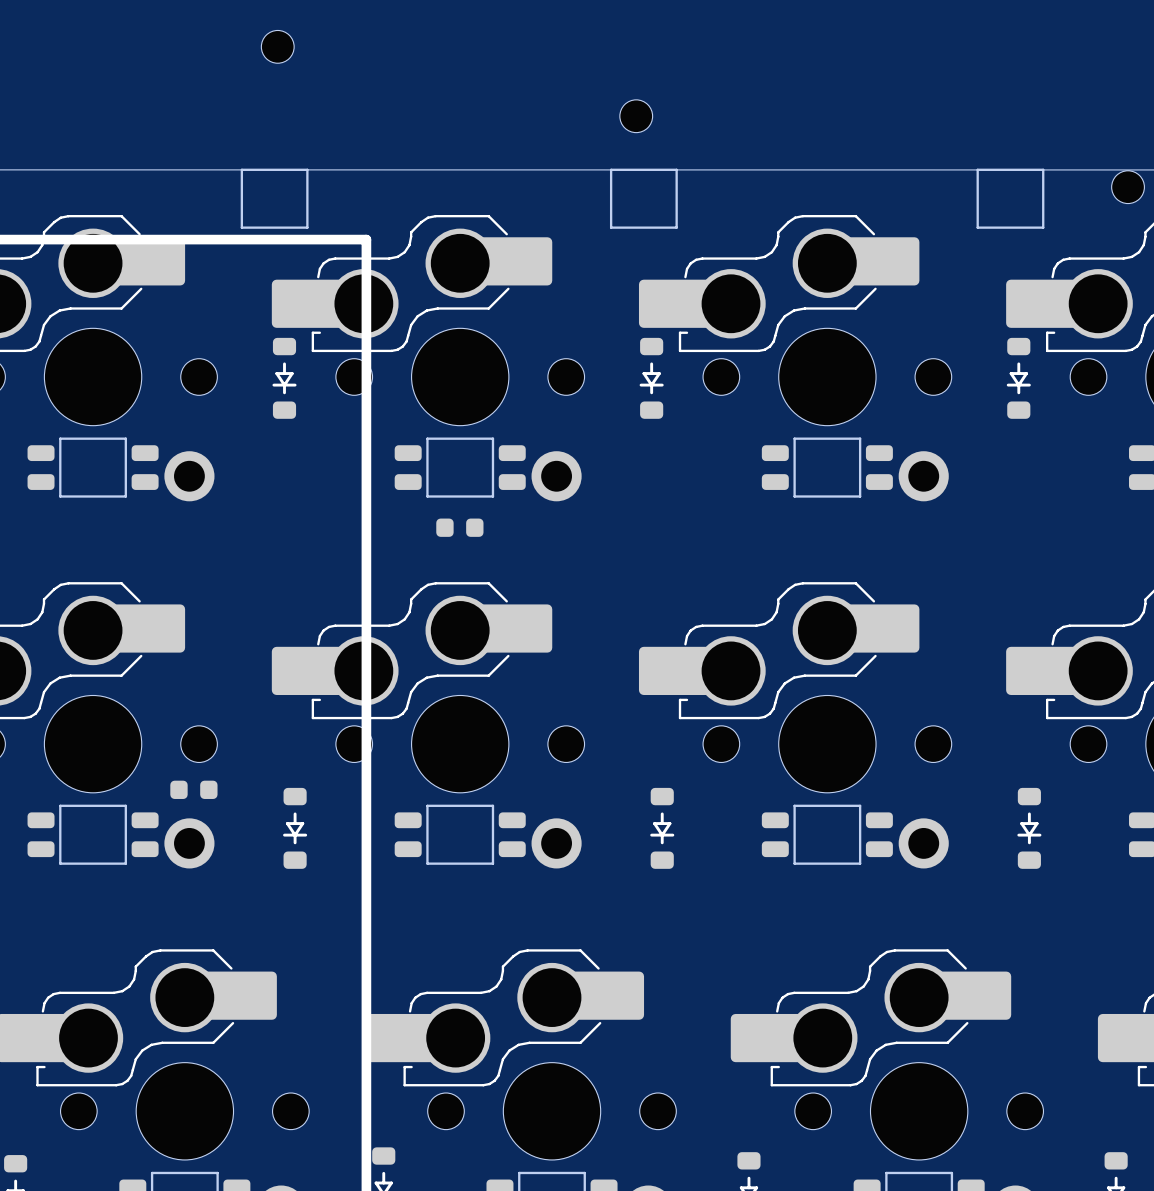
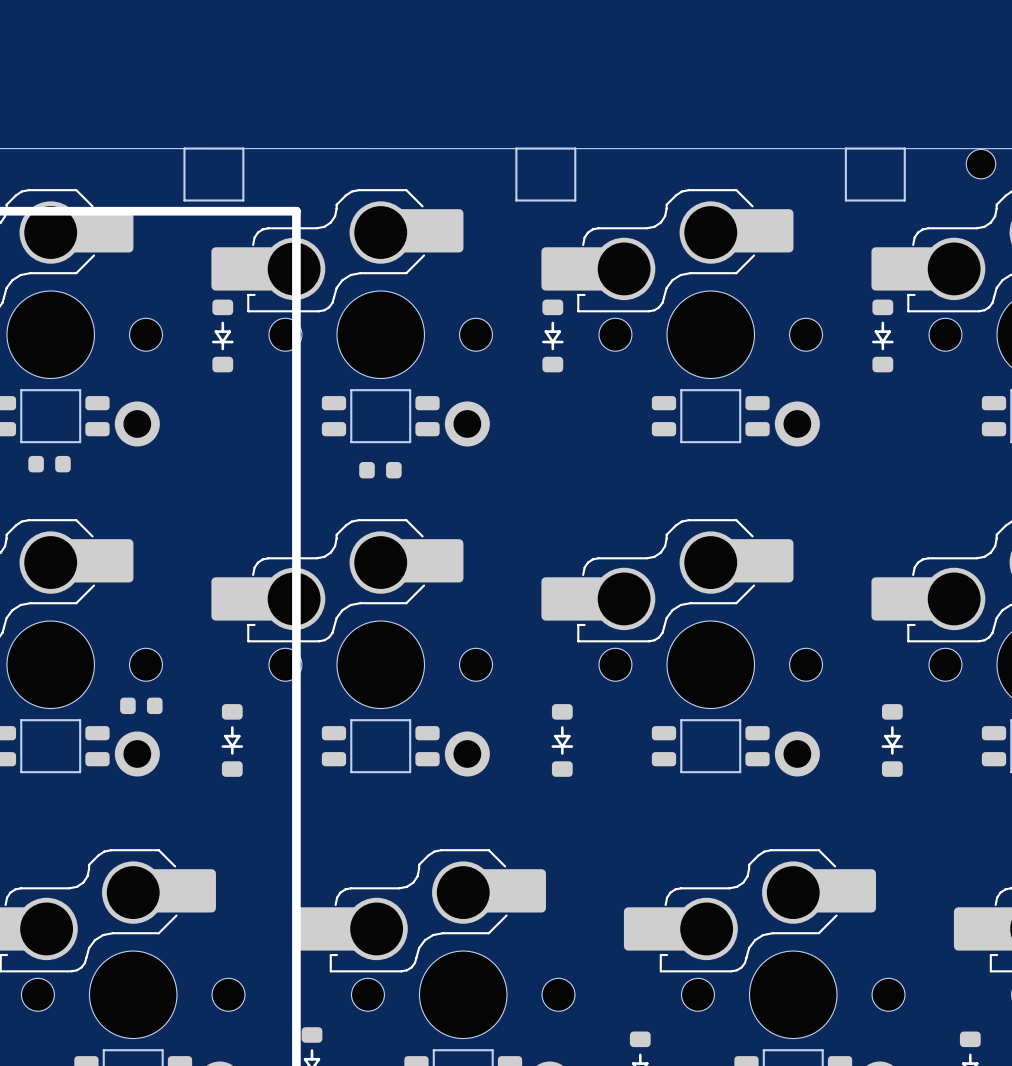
part: (277, 46) -> none
part: (636, 116) -> none
part: none -> (49, 464)

